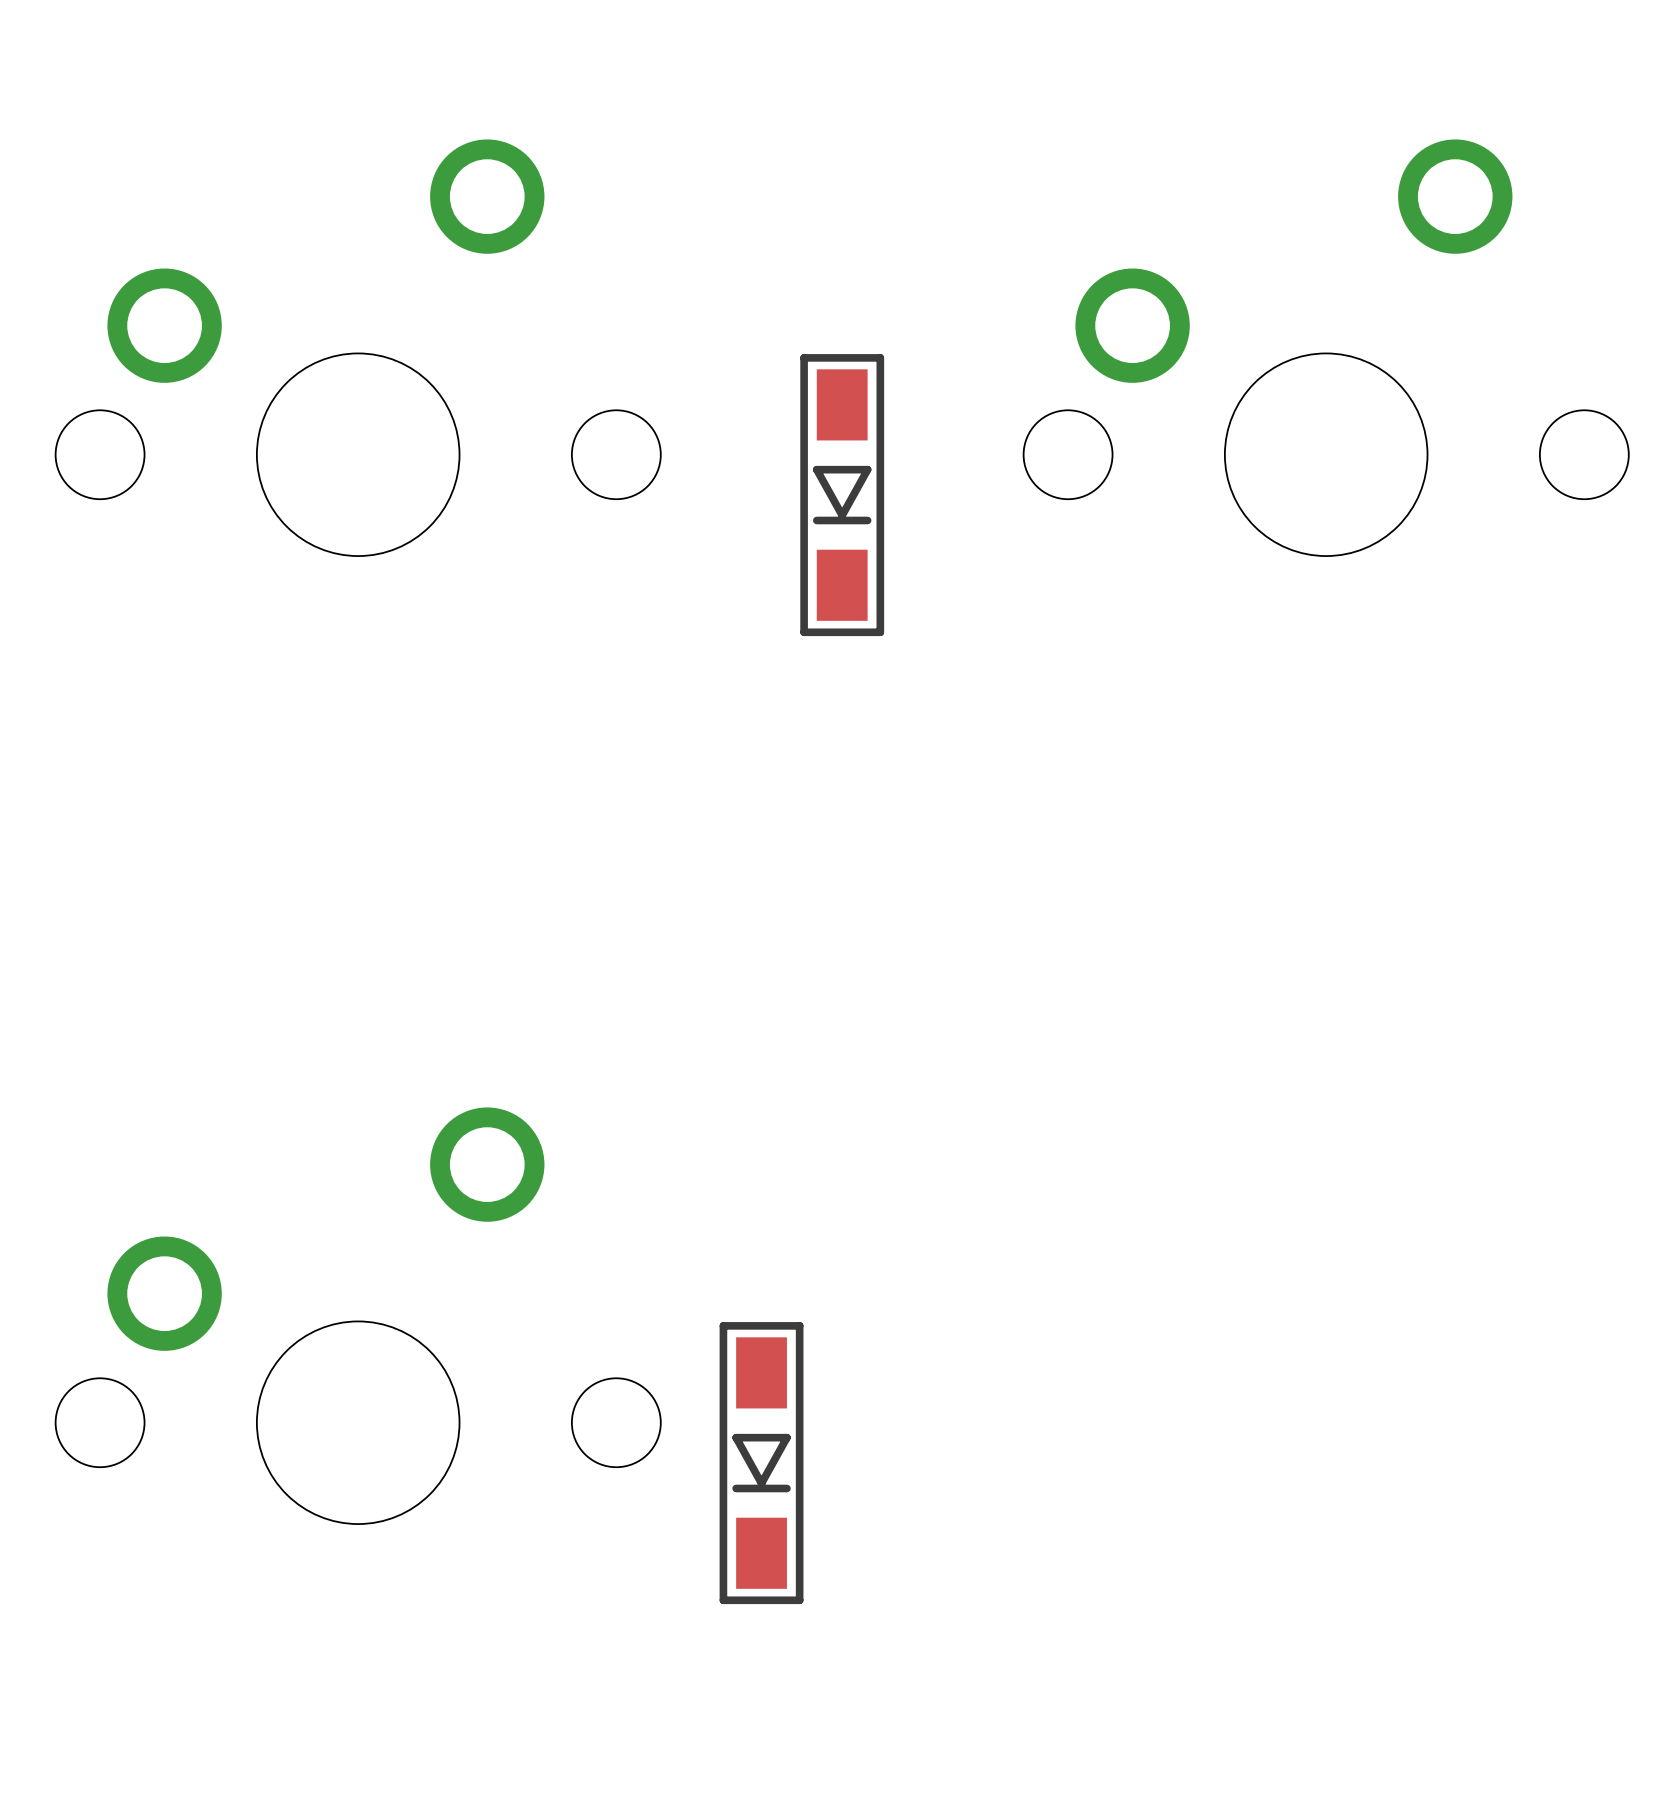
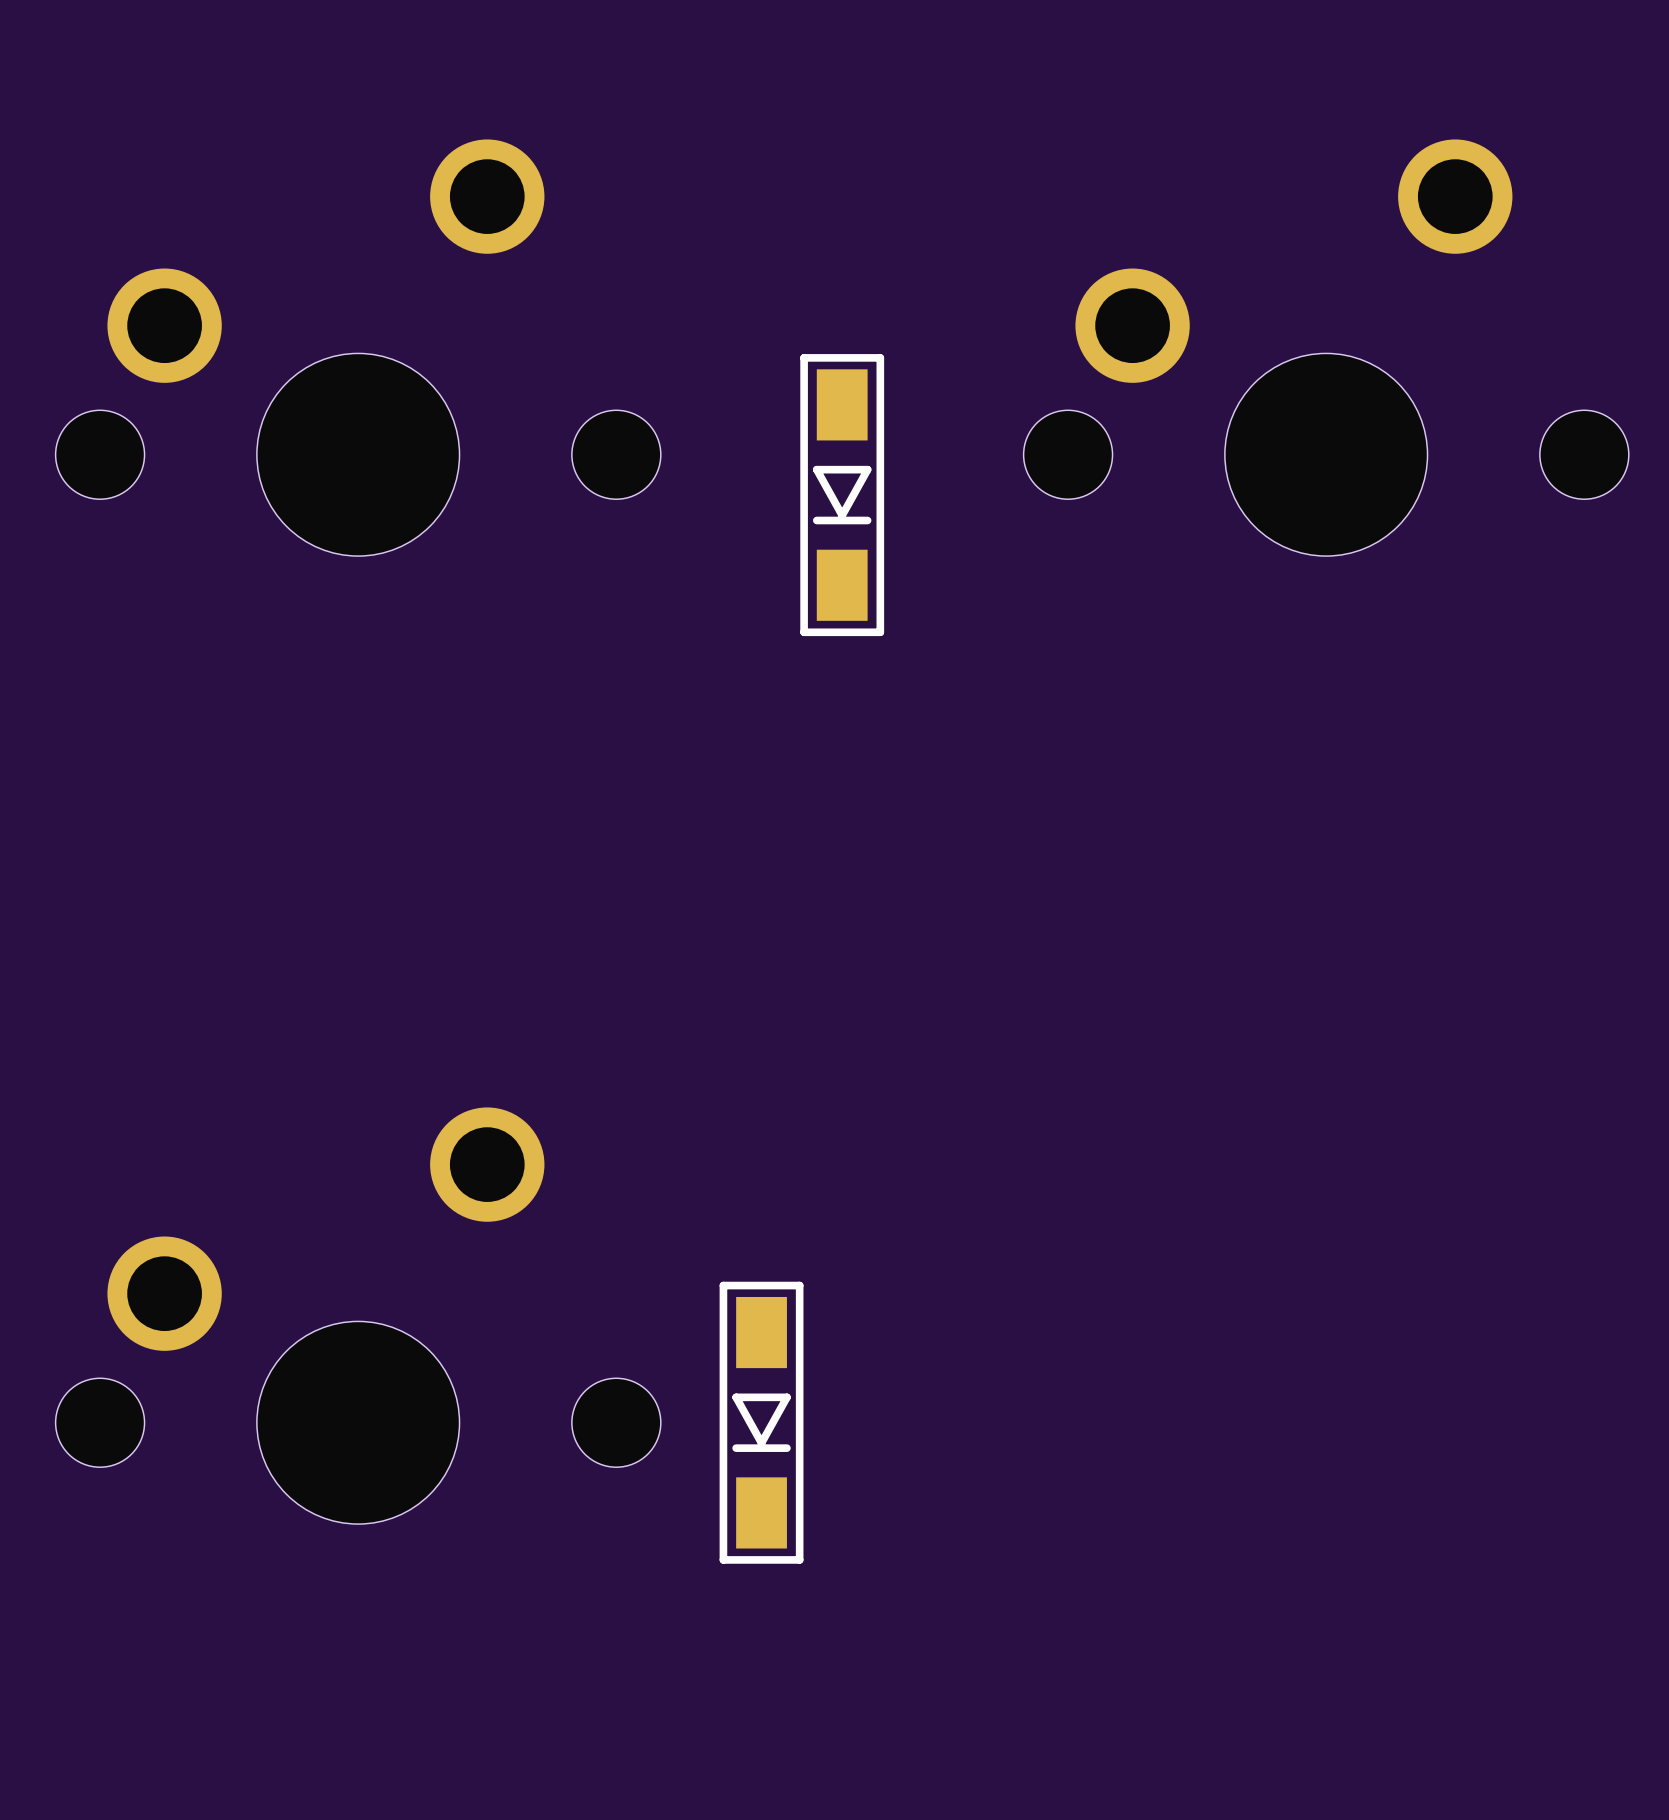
part position: (761, 1463) -> (761, 1422)

